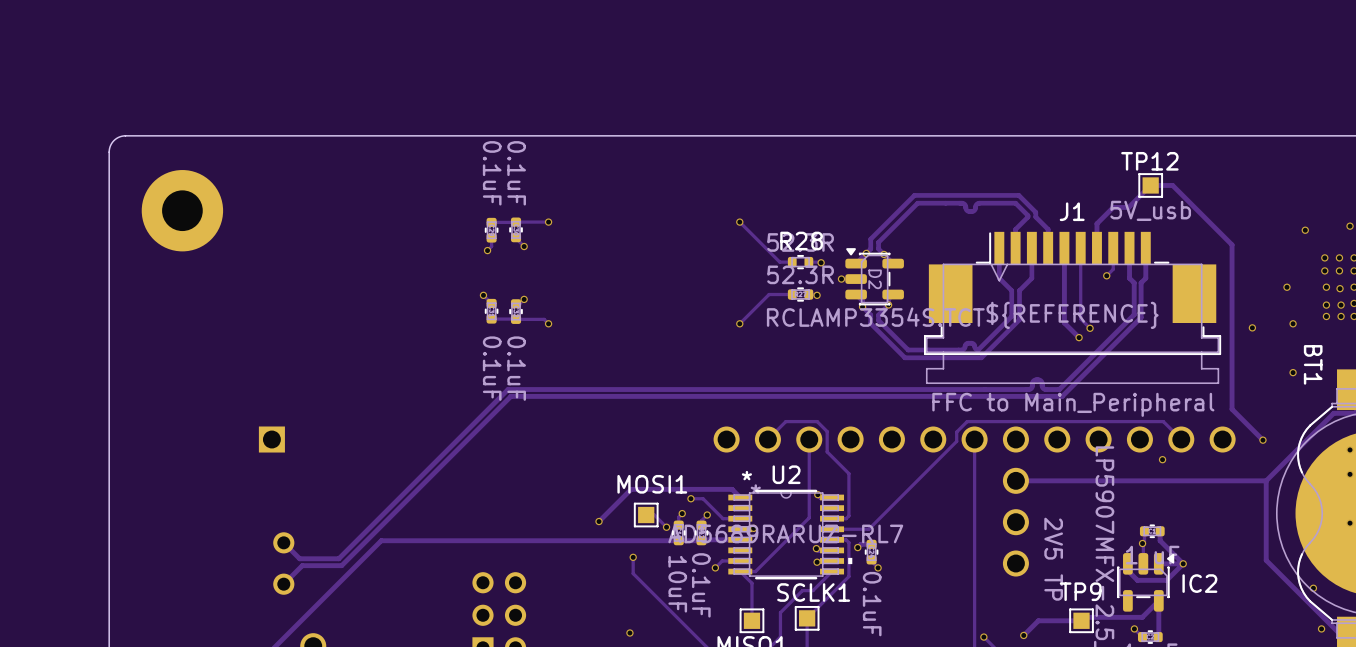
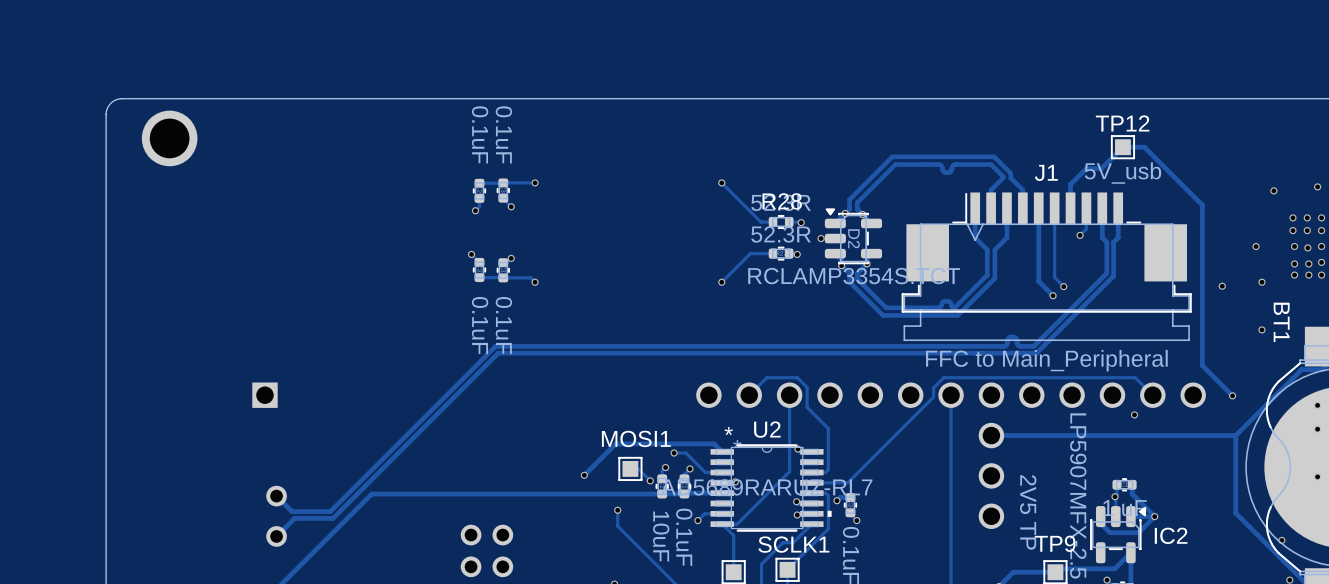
part: none -> (169, 138)
part: (182, 210) -> none
text: ${REFERENCE} (1072, 315) -> none

